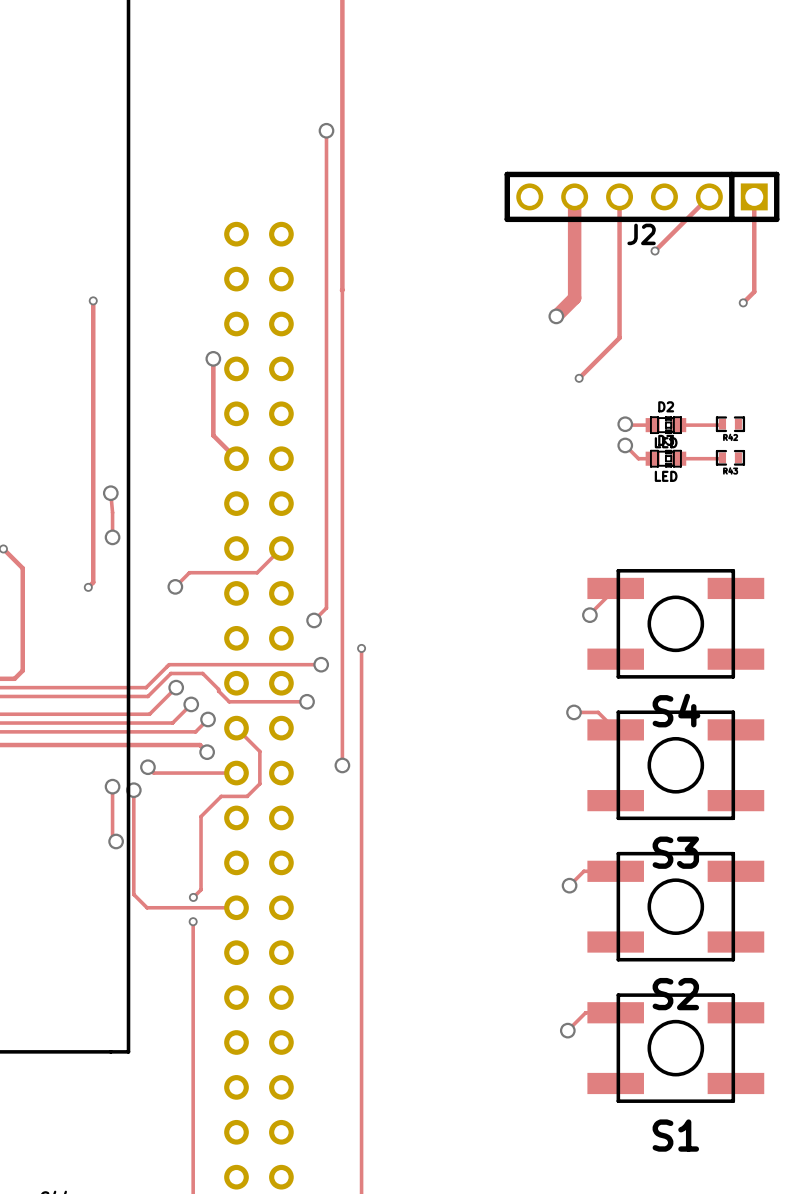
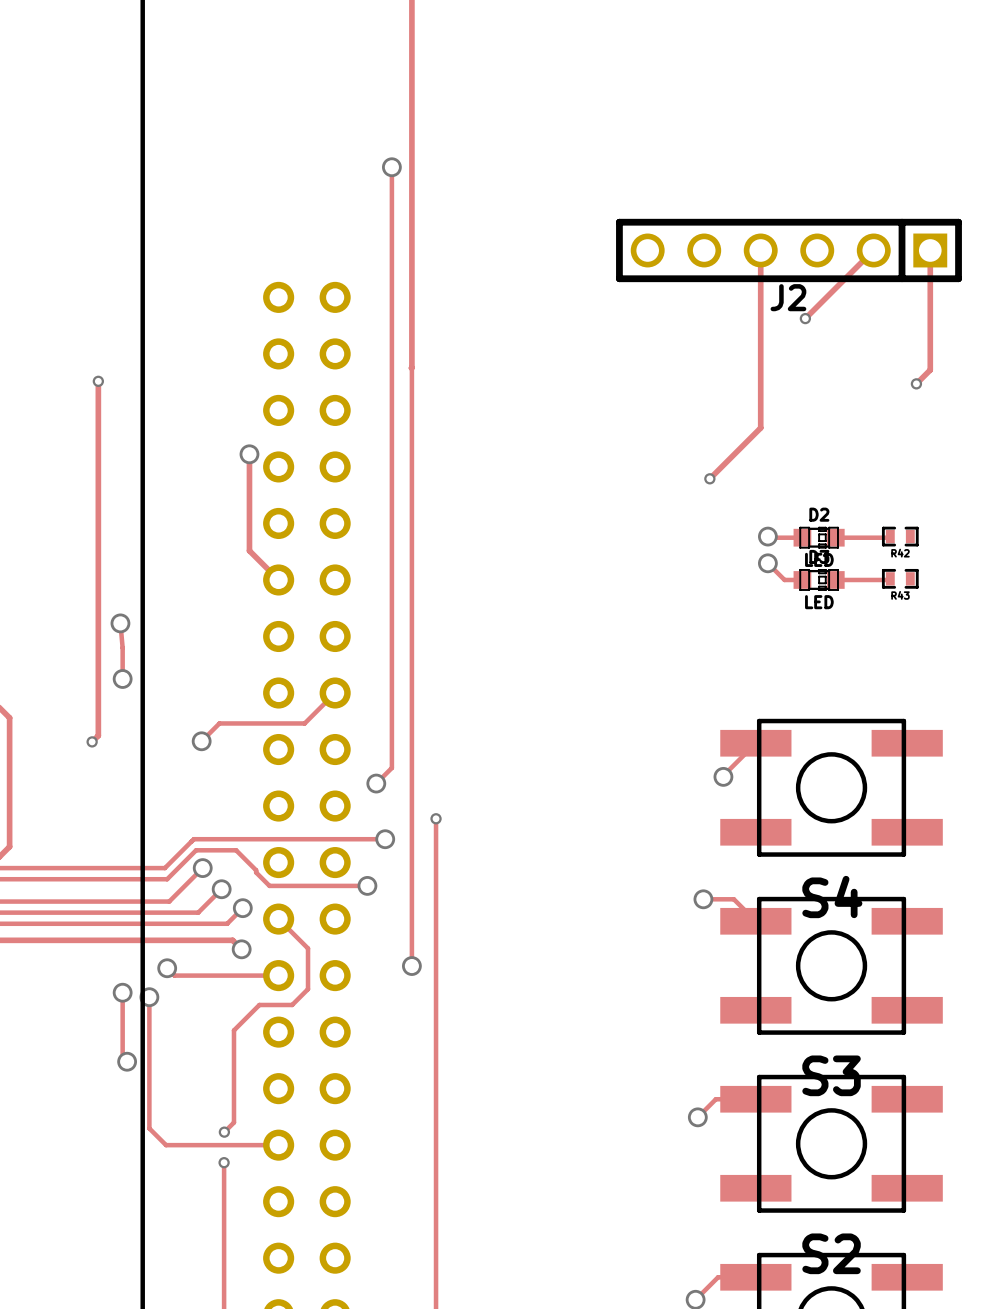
track: (574, 196) (574, 298) (556, 316) -> none
via: (556, 316) -> none

